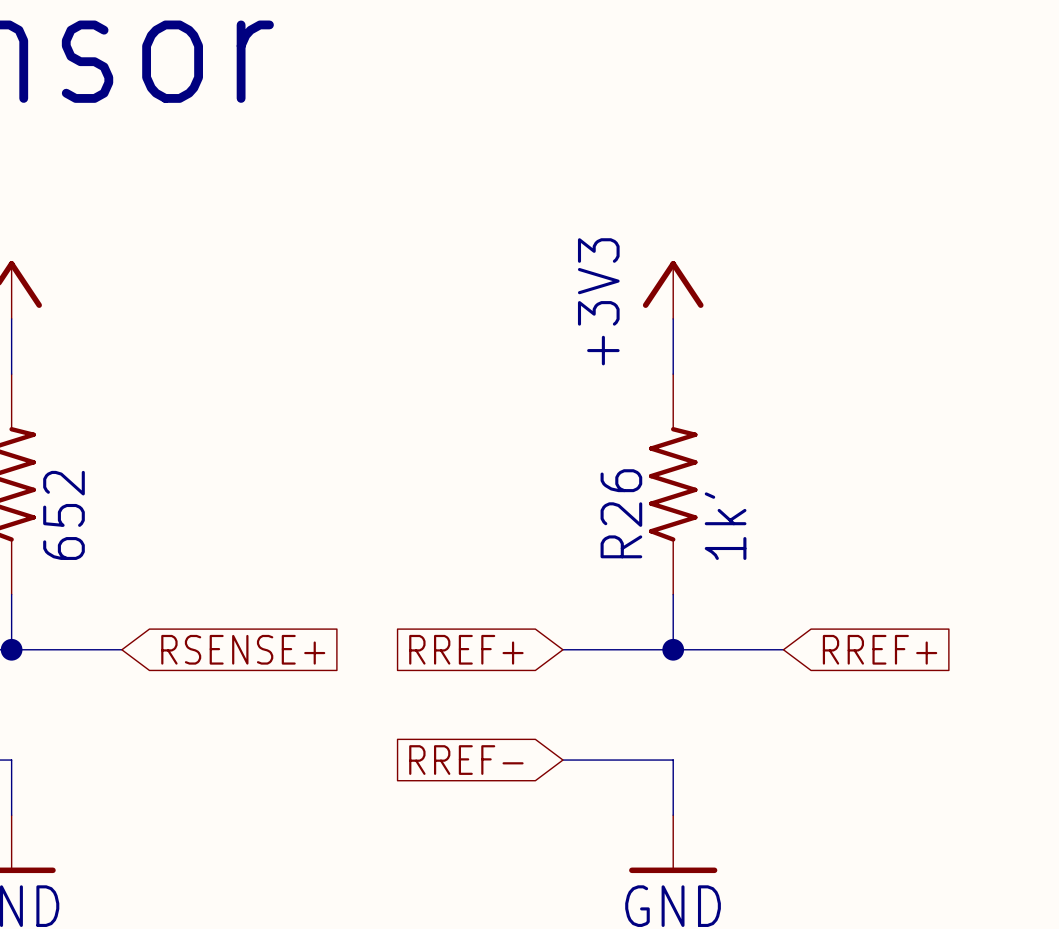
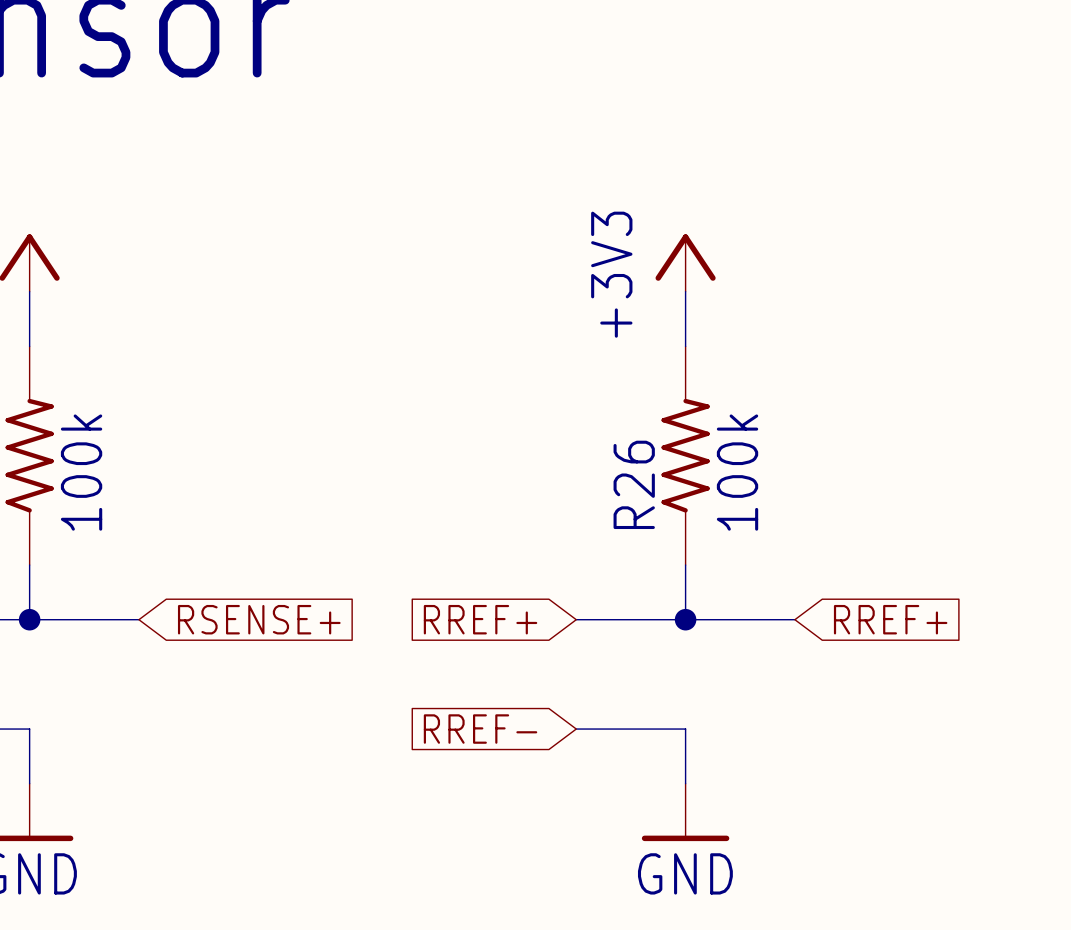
part value: 652 (64, 515) -> 100k (81, 472)
R26 value: 1k' (725, 526) -> 100k (737, 472)

